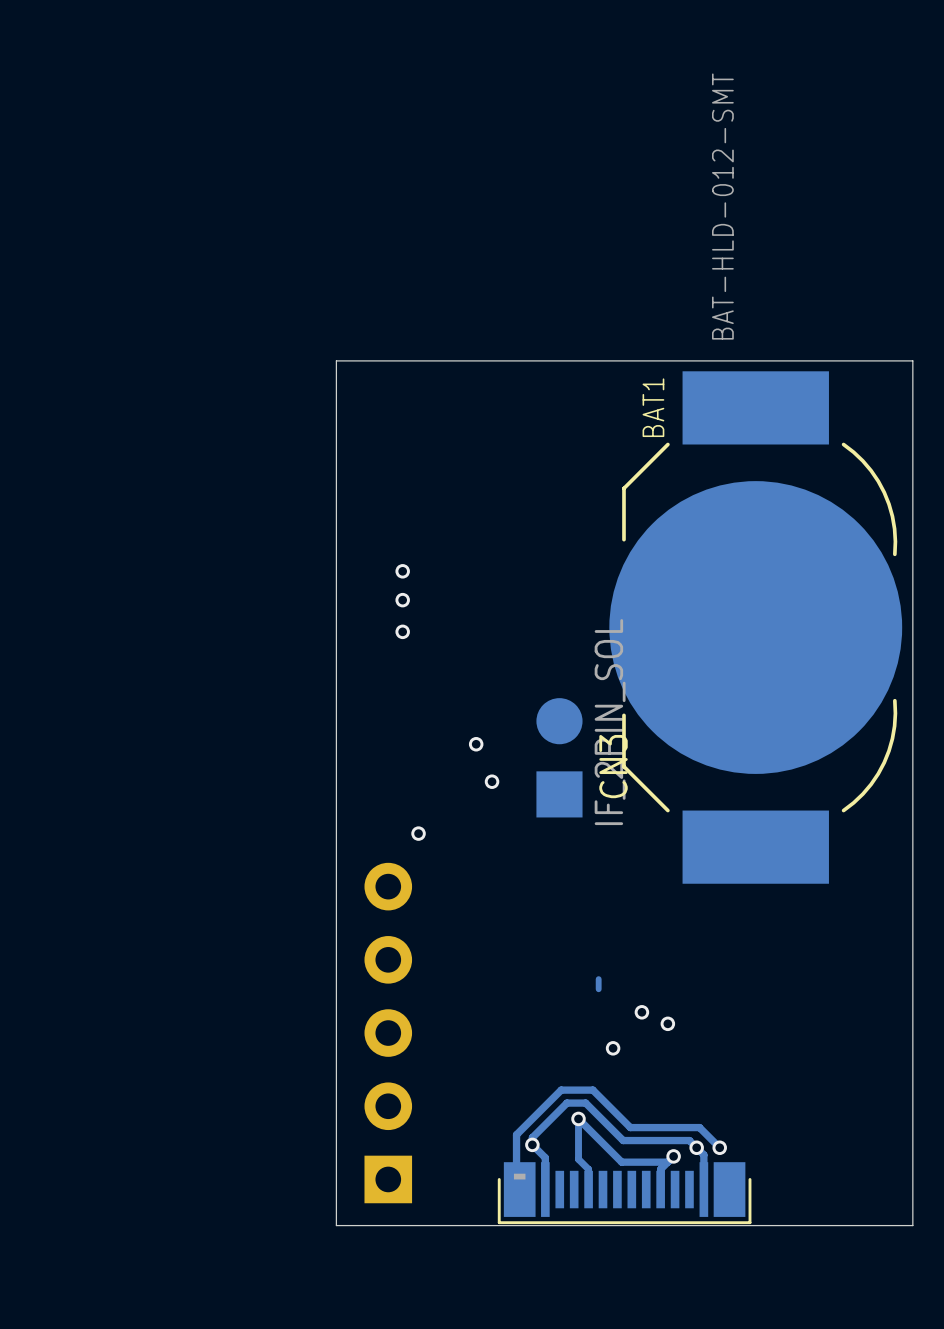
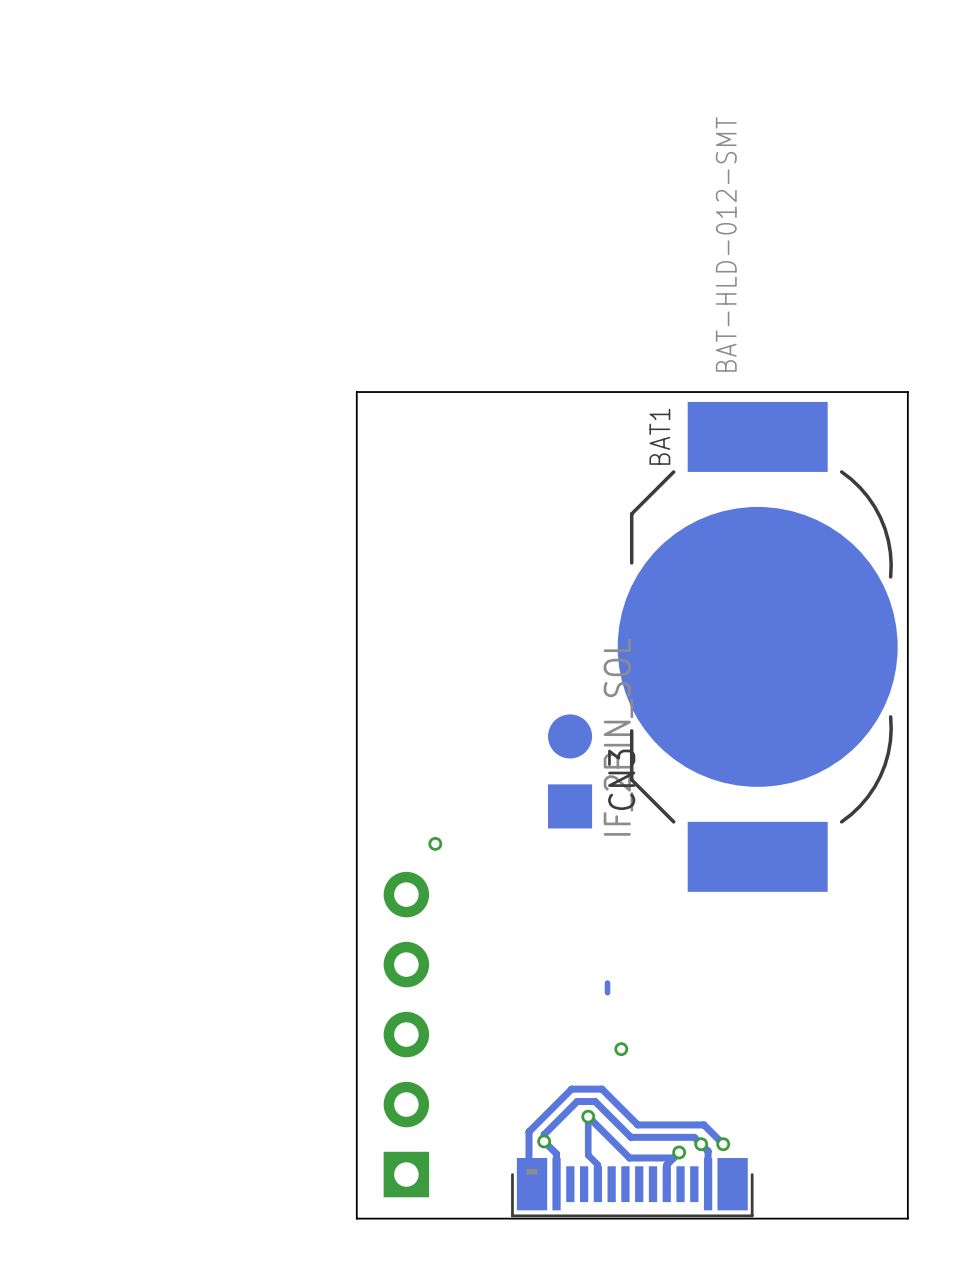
via: (402, 571) -> none
via: (402, 600) -> none
via: (402, 631) -> none
via: (476, 744) -> none
via: (492, 781) -> none
via: (641, 1012) -> none
via: (667, 1023) -> none

